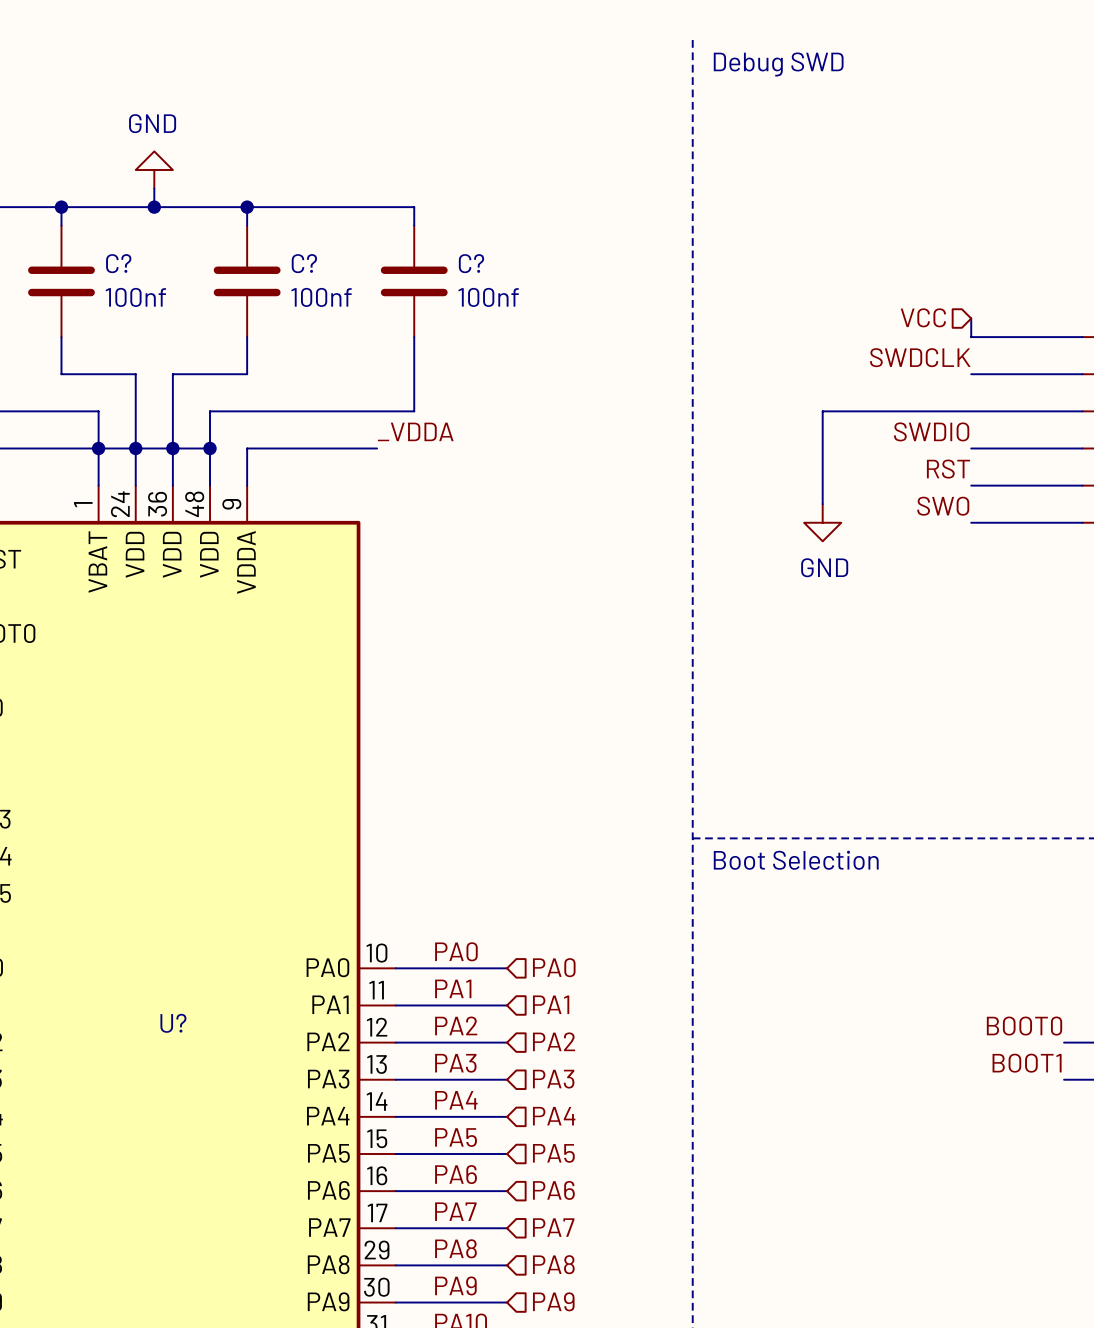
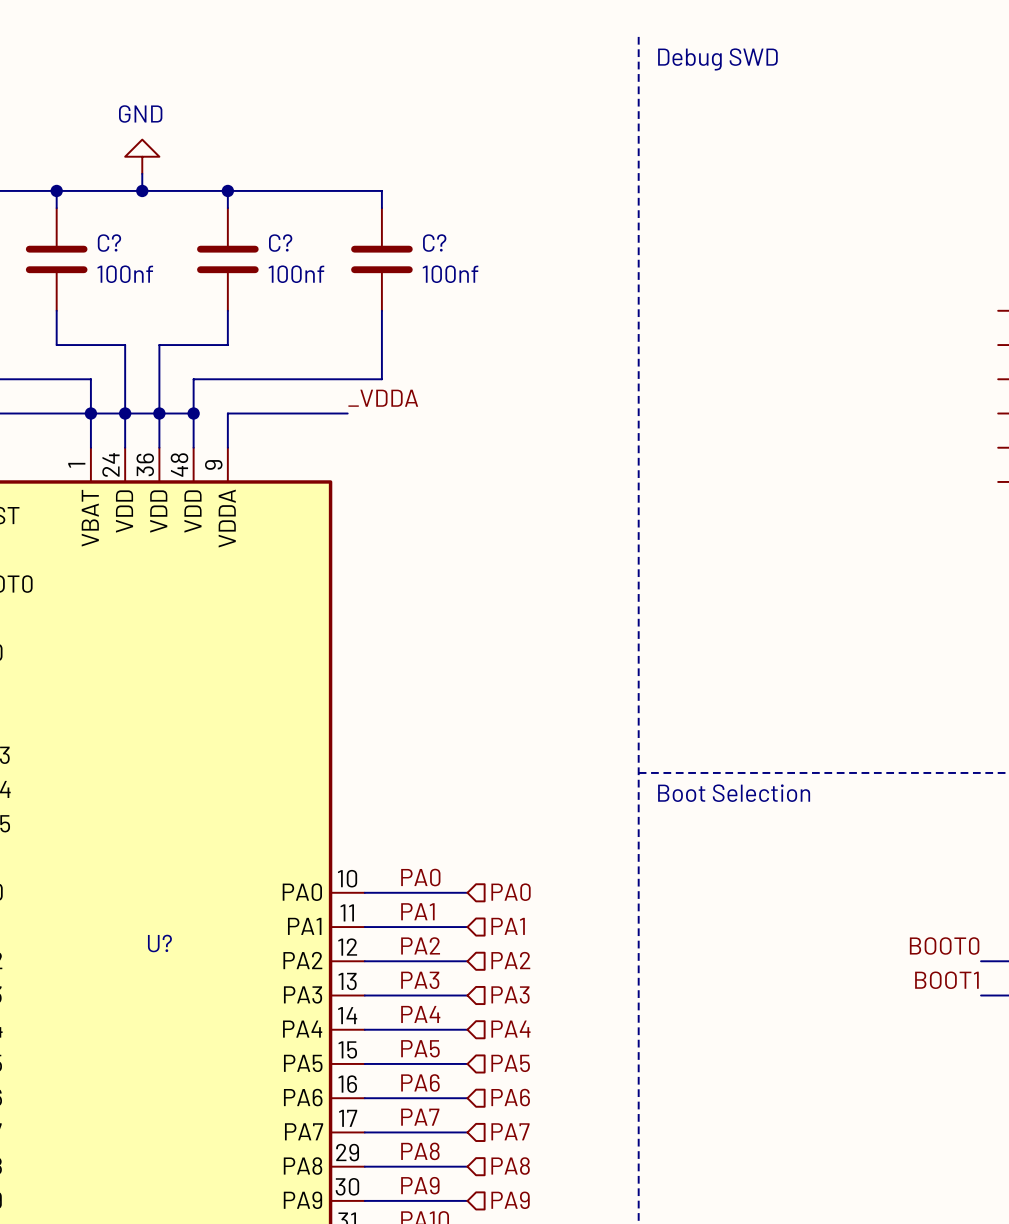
hierarchical label: VCC (923, 317) -> none
wire: (971, 318) (971, 337) (1082, 337) -> none
label: SWDCLK (920, 357) -> none
wire: (971, 374) (1082, 374) -> none
wire: (1082, 411) (822, 411) (822, 504) -> none
label: SWDIO (931, 431) -> none
wire: (971, 448) (1082, 448) -> none
label: RST (948, 469) -> none
wire: (971, 485) (1082, 485) -> none
label: SWO (943, 506) -> none
power symbol: GND (822, 522) -> none
wire: (971, 522) (1082, 522) -> none

